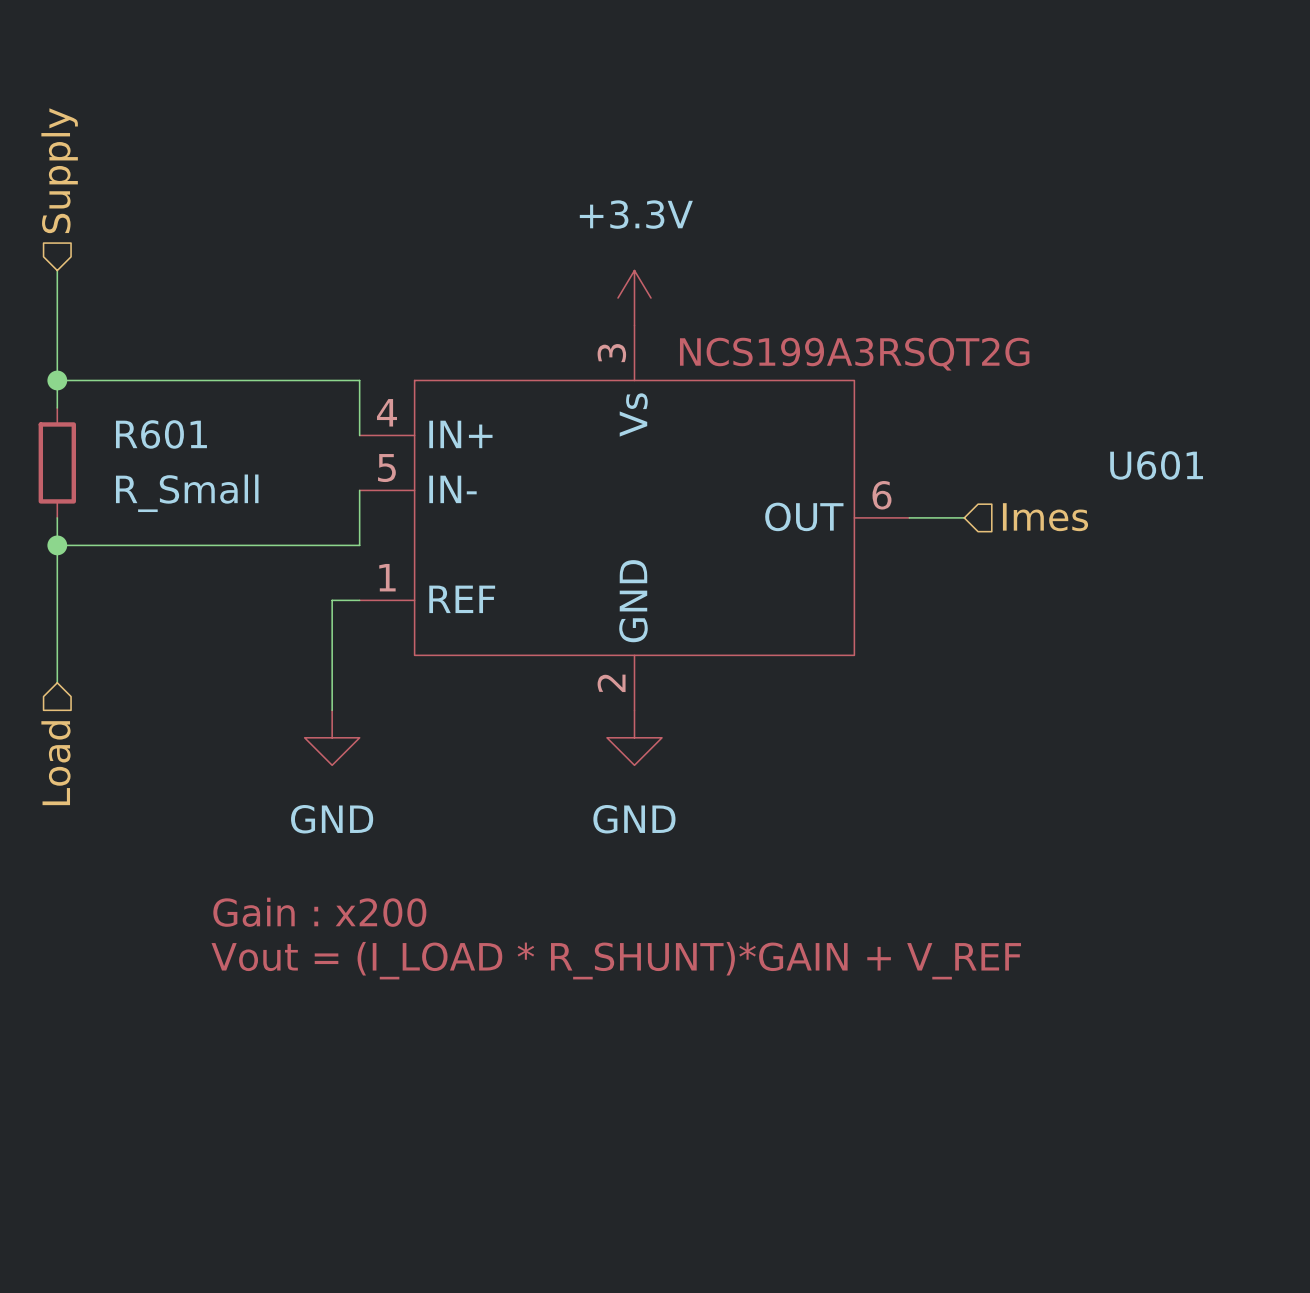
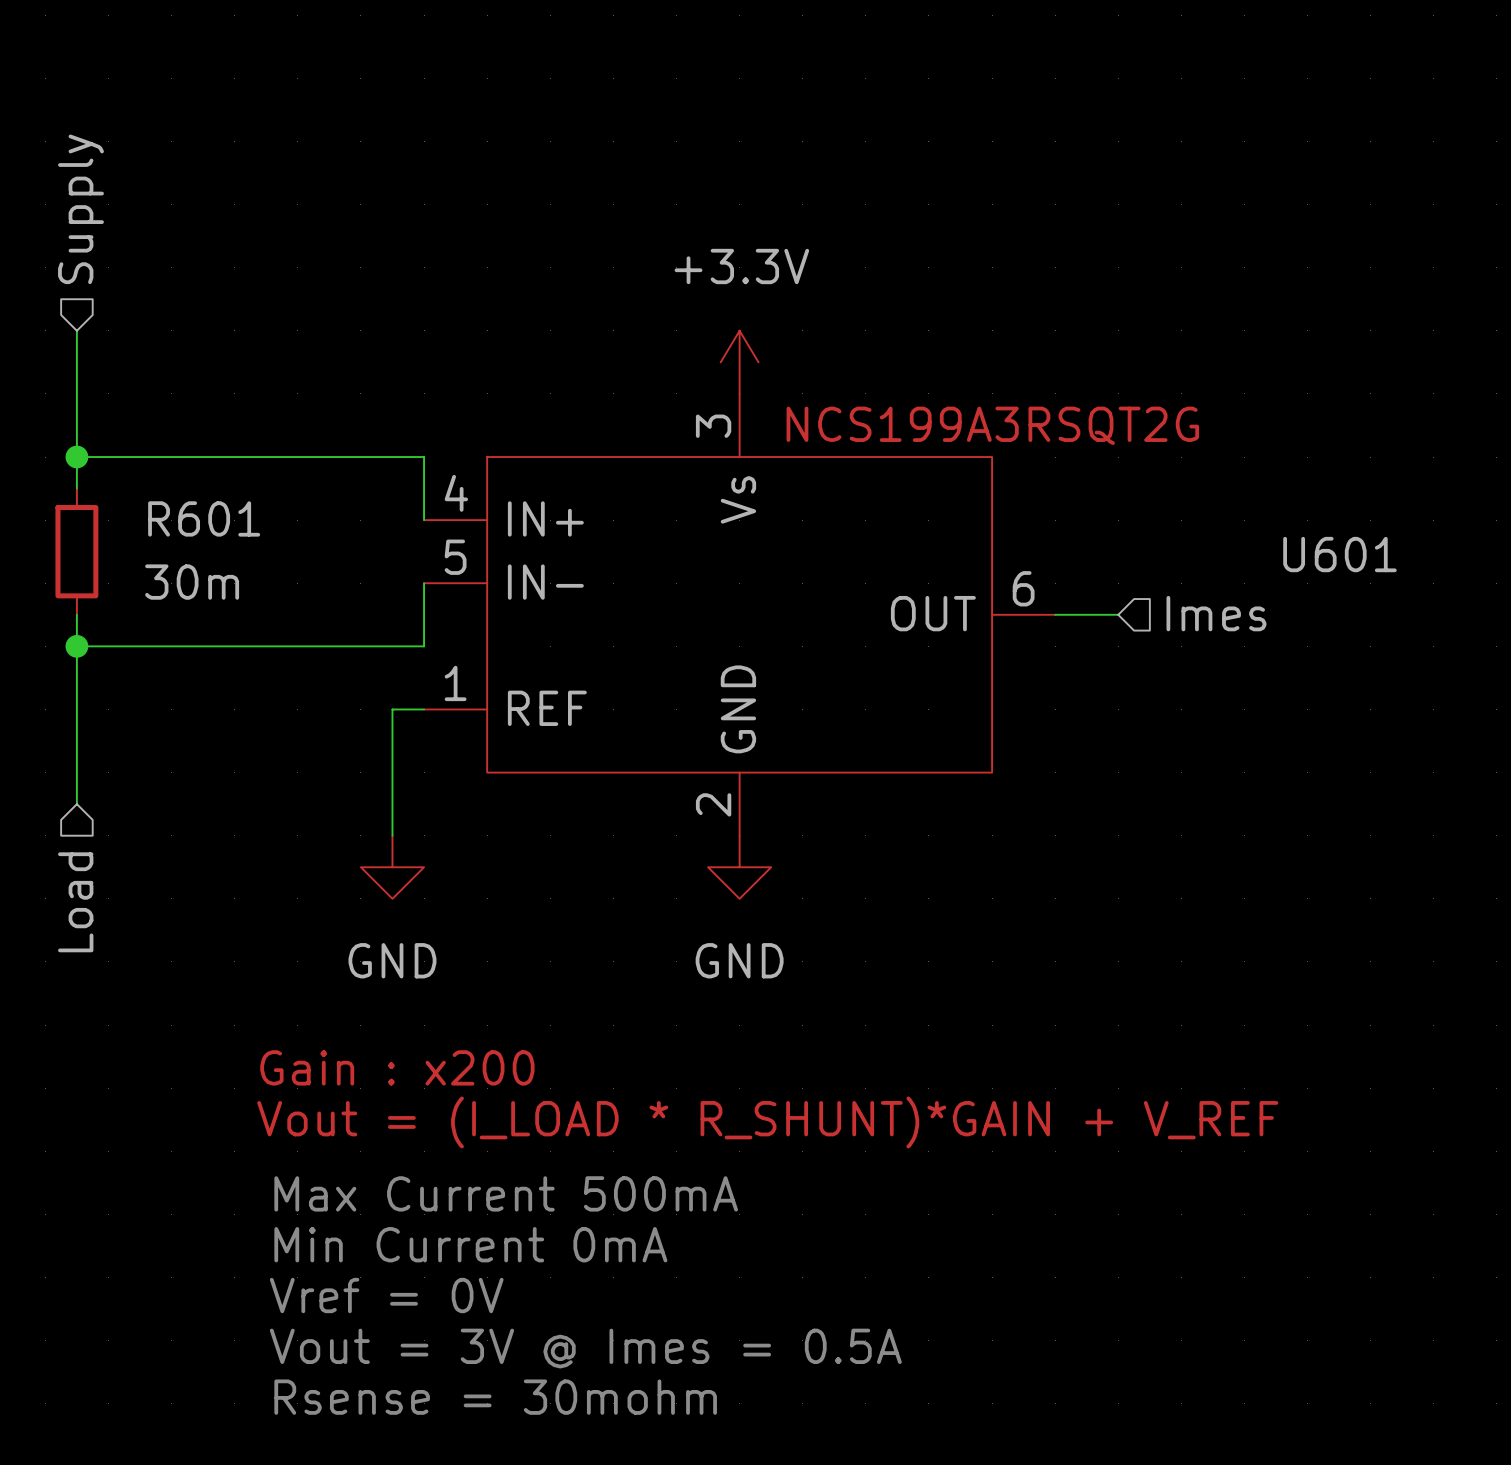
R601 value: R_Small (187, 493) -> 30m (192, 582)
text: none -> Max Current 500mA (506, 1193)
text: none -> Min Current 0mA (470, 1244)
text: none -> Vref = 0V (386, 1295)
text: none -> Vout = 3V @ Imes = 0.5A (585, 1348)
text: none -> Rsense = 30mohm (495, 1397)

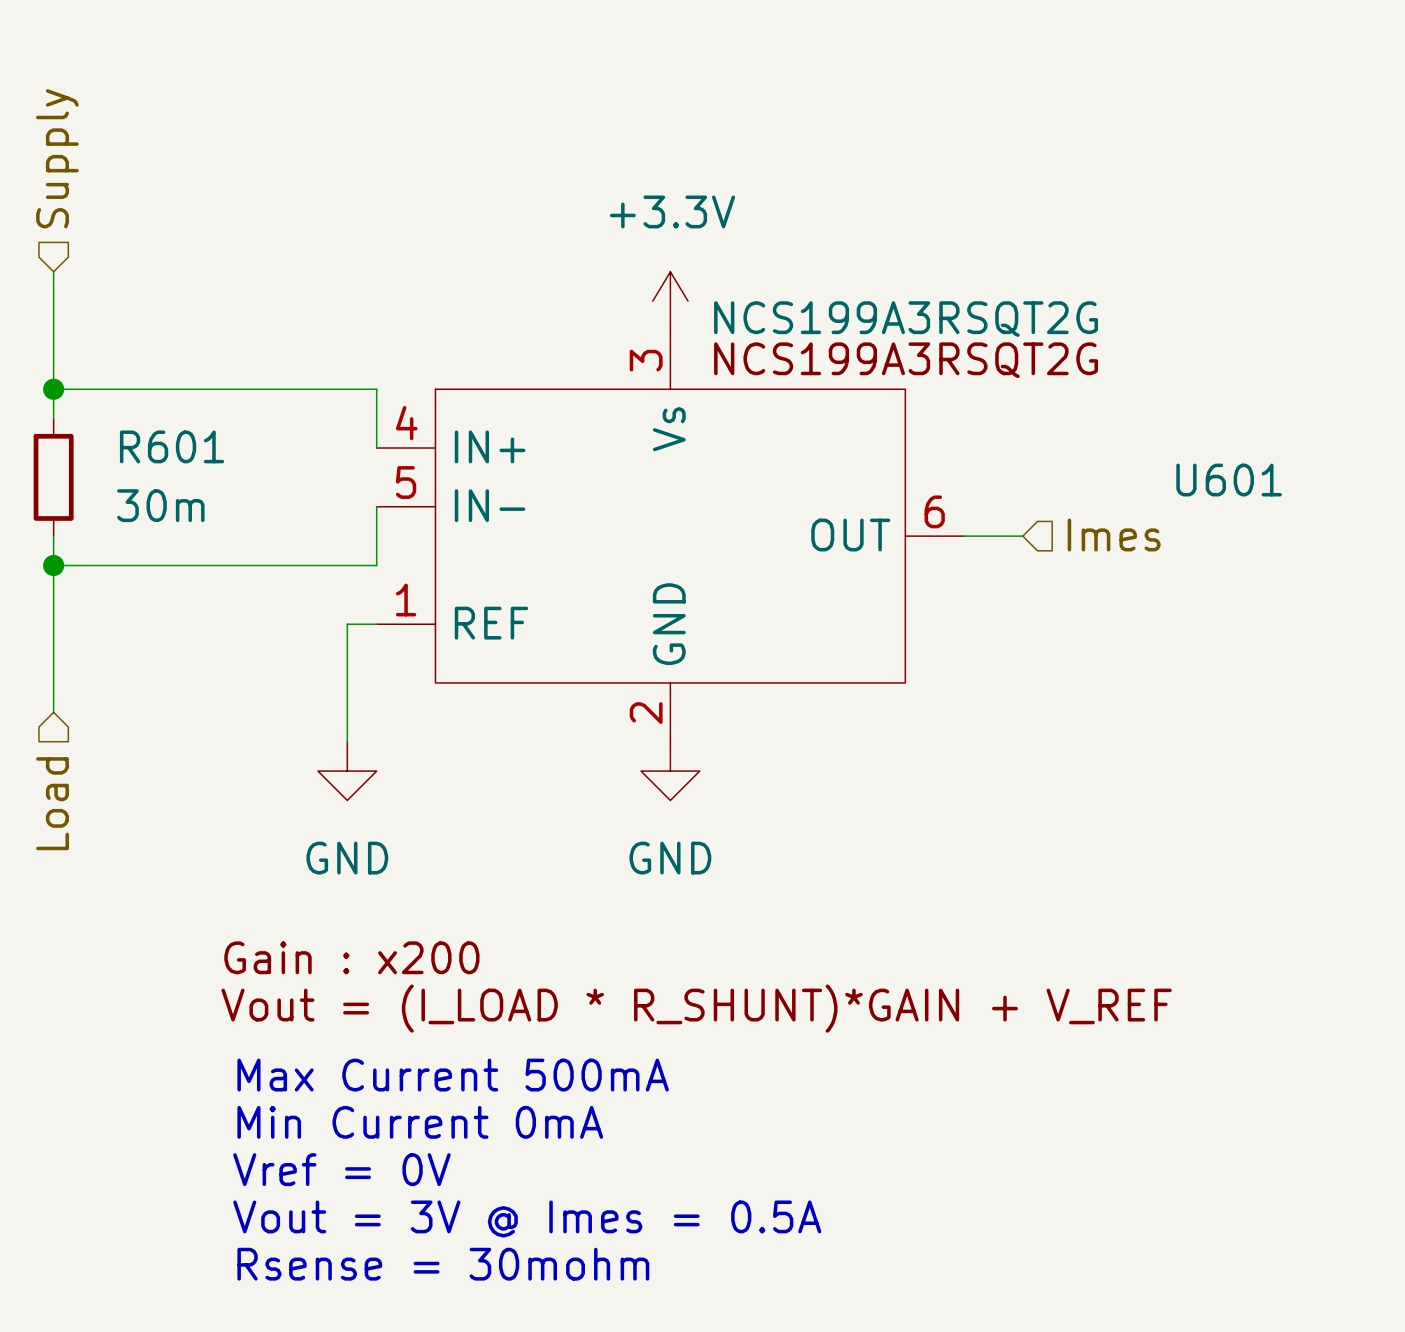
U601 value: none -> NCS199A3RSQT2G (906, 319)

